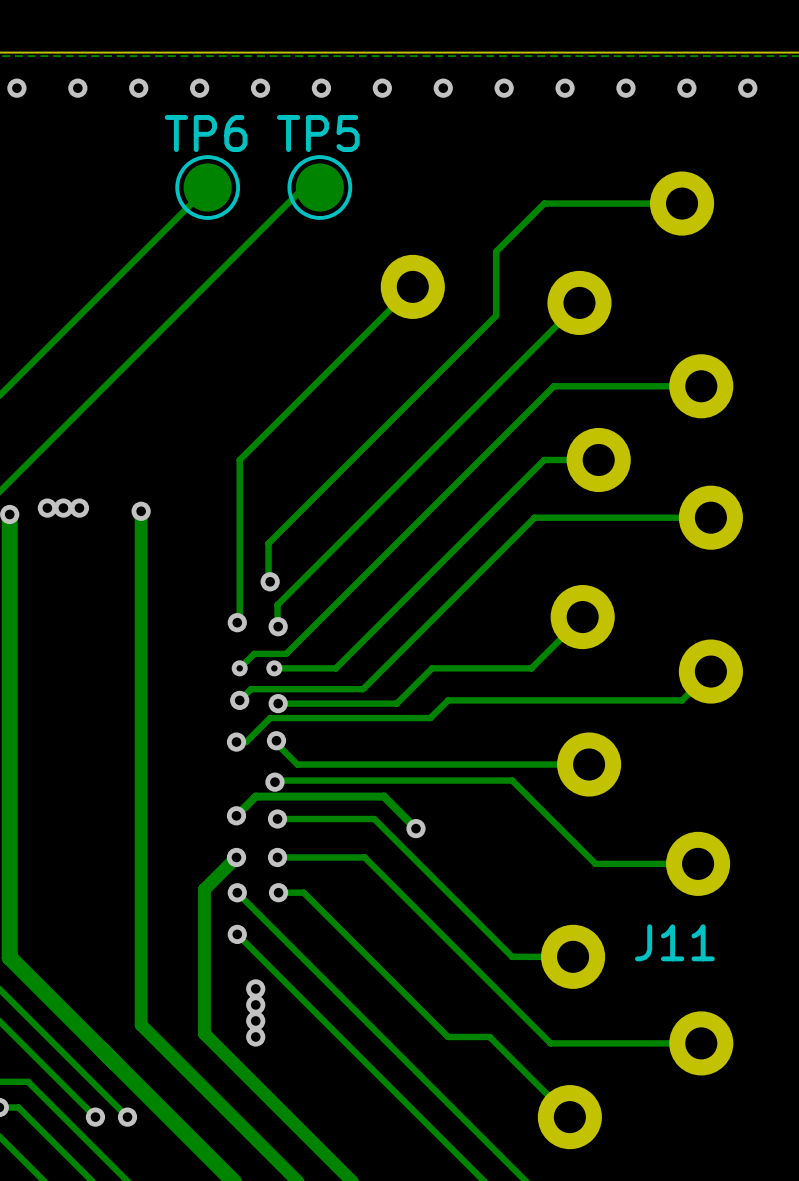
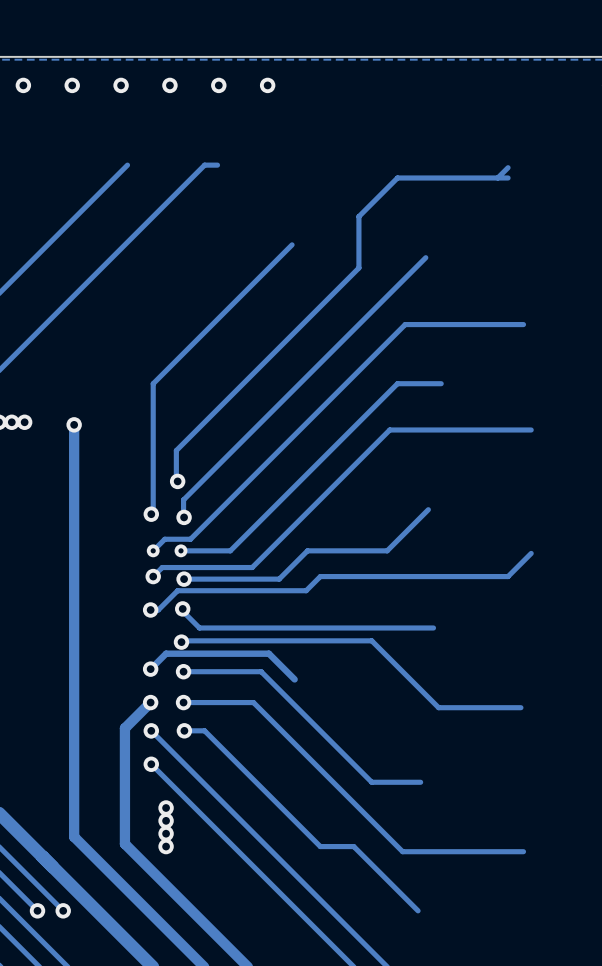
via: (443, 88) -> none
via: (504, 88) -> none
via: (565, 88) -> none
via: (625, 88) -> none
via: (686, 88) -> none
via: (747, 88) -> none
TP6: (207, 187) -> none
TP5: (319, 187) -> none
part: (682, 203) -> none
part: (412, 286) -> none
part: (579, 302) -> none
part: (701, 386) -> none
part: (598, 460) -> none
part: (710, 517) -> none
part: (582, 617) -> none
part: (710, 671) -> none
part: (589, 764) -> none
via: (416, 828) -> none
J11: (698, 863) -> none
part: (573, 956) -> none
part: (701, 1043) -> none
part: (569, 1117) -> none

